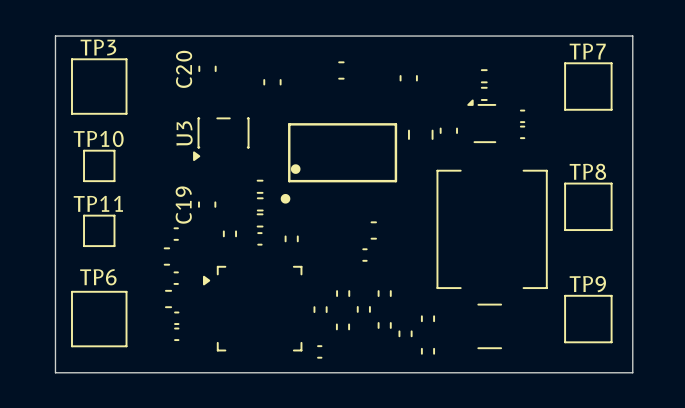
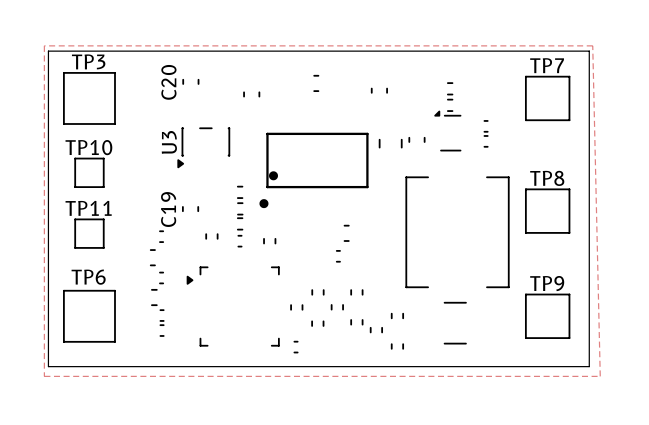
zone outline: none -> (44, 45) (44, 376) (600, 376) (592, 45) (44, 45)

